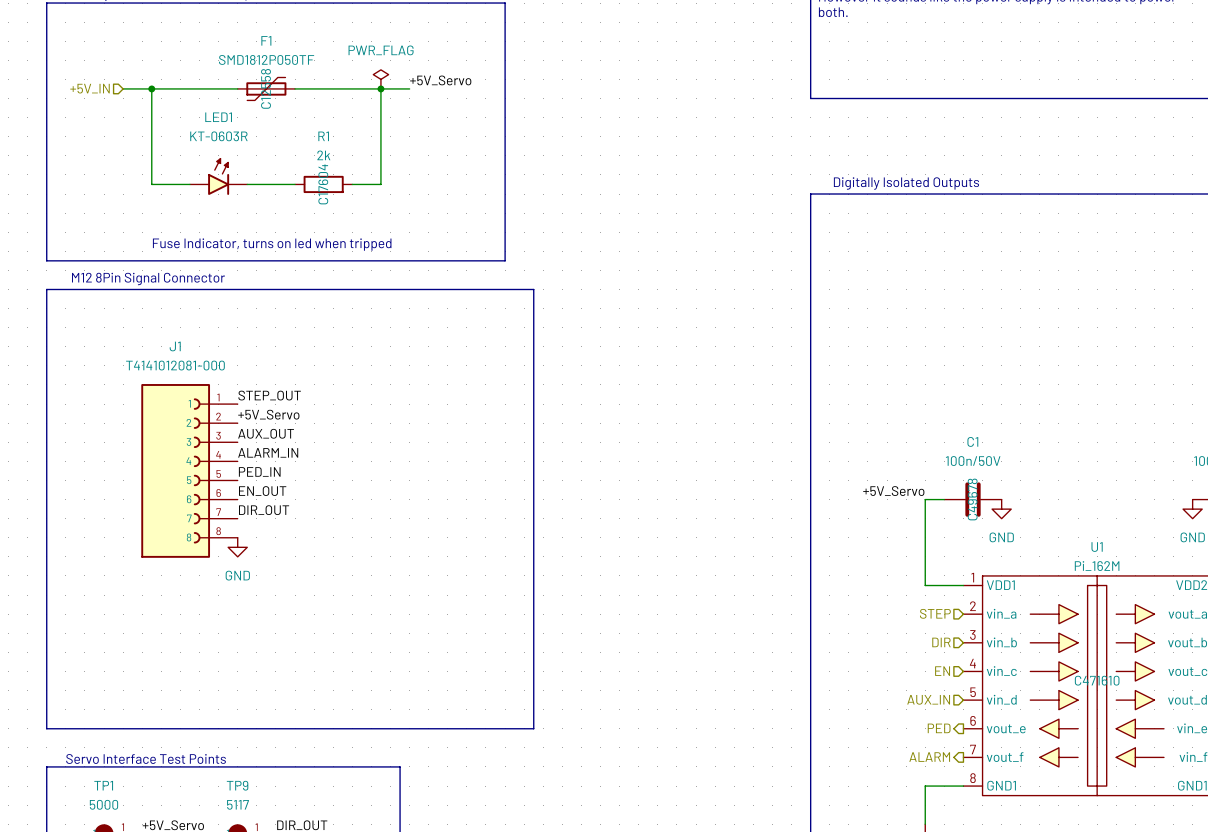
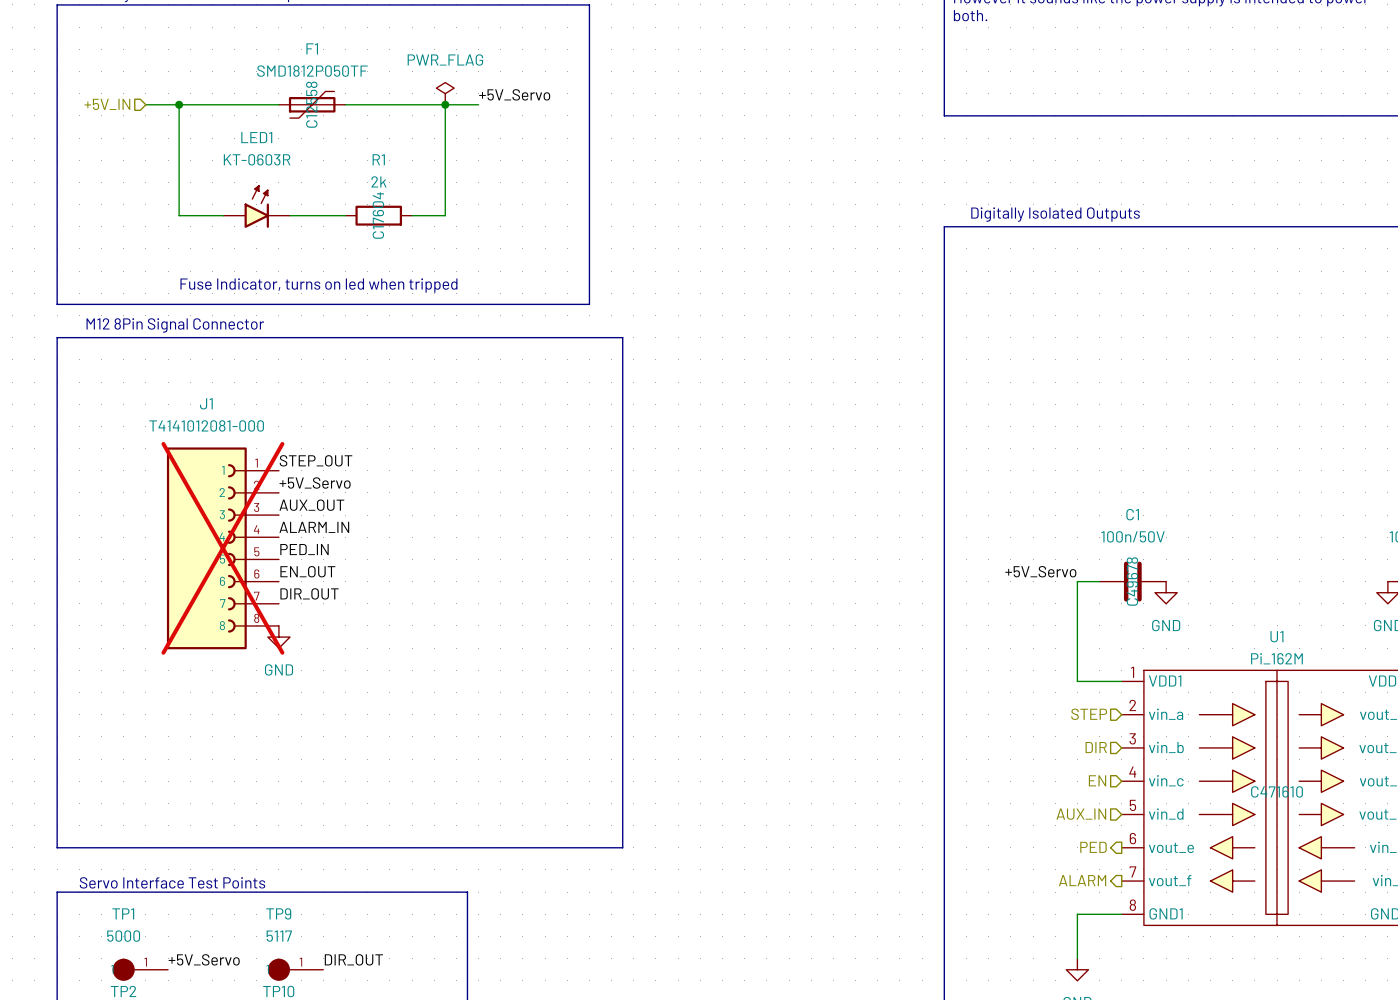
J1 do-not-place cross: none -> (222, 548)

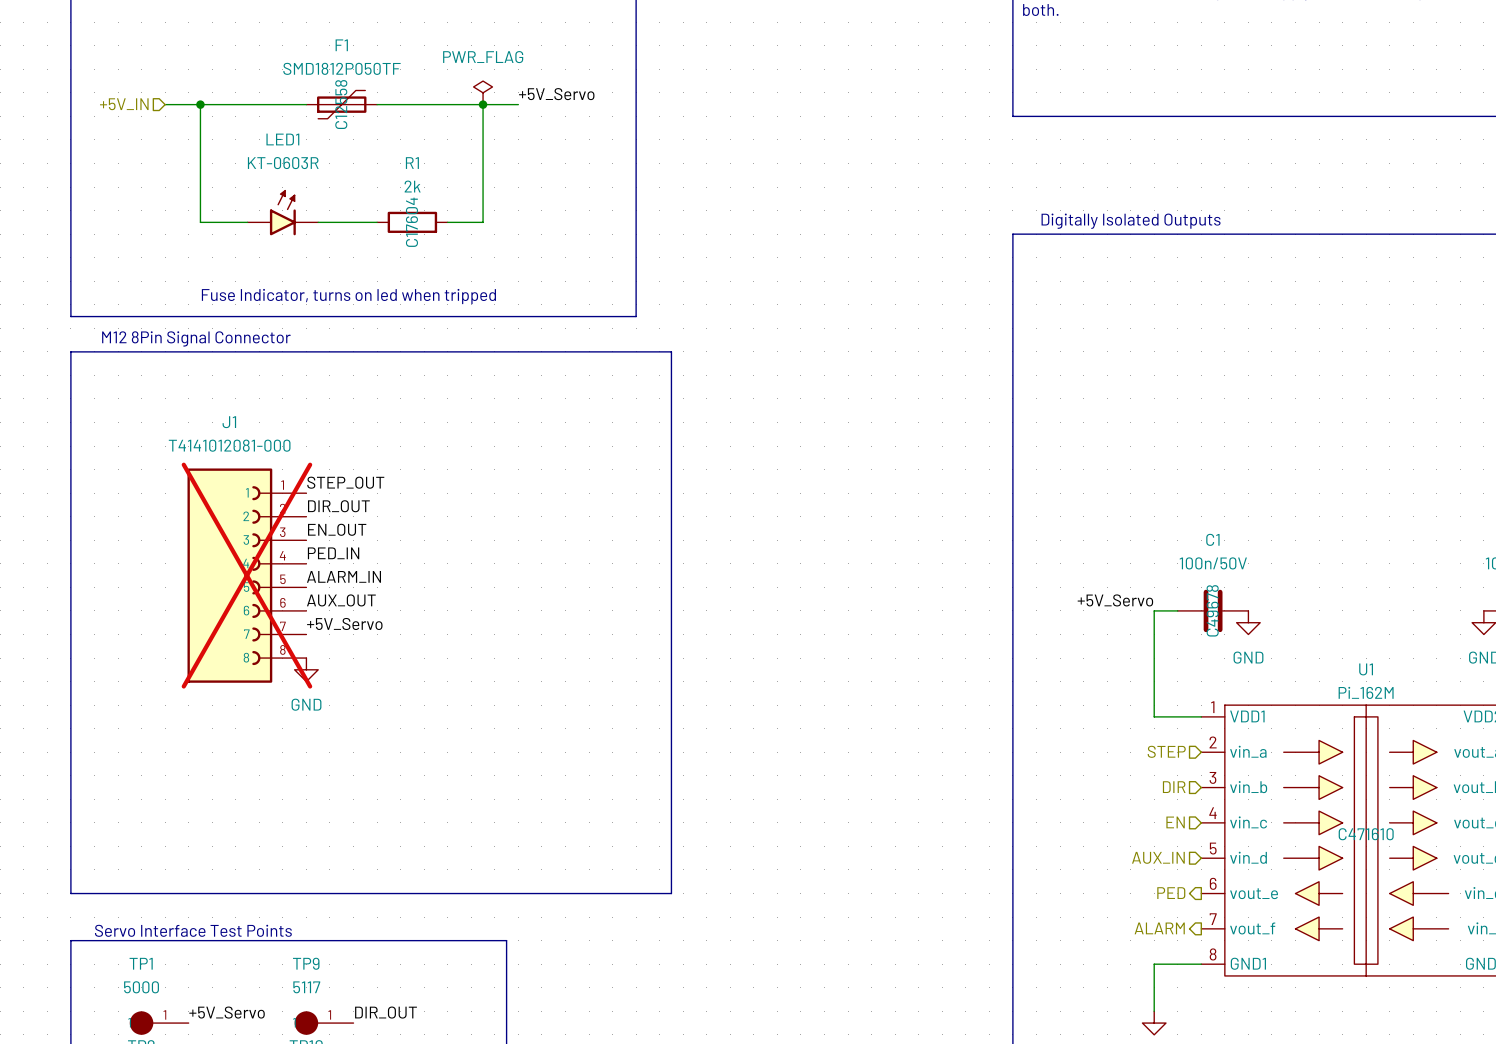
label: +5V_Servo (315, 483) -> DIR_OUT (338, 506)
label: AUX_OUT (311, 505) -> EN_OUT (337, 529)
label: ALARM_IN (314, 527) -> PED_IN (333, 553)
label: PED_IN (304, 549) -> ALARM_IN (343, 576)
label: EN_OUT (307, 571) -> AUX_OUT (341, 600)
label: DIR_OUT (309, 593) -> +5V_Servo (344, 623)

